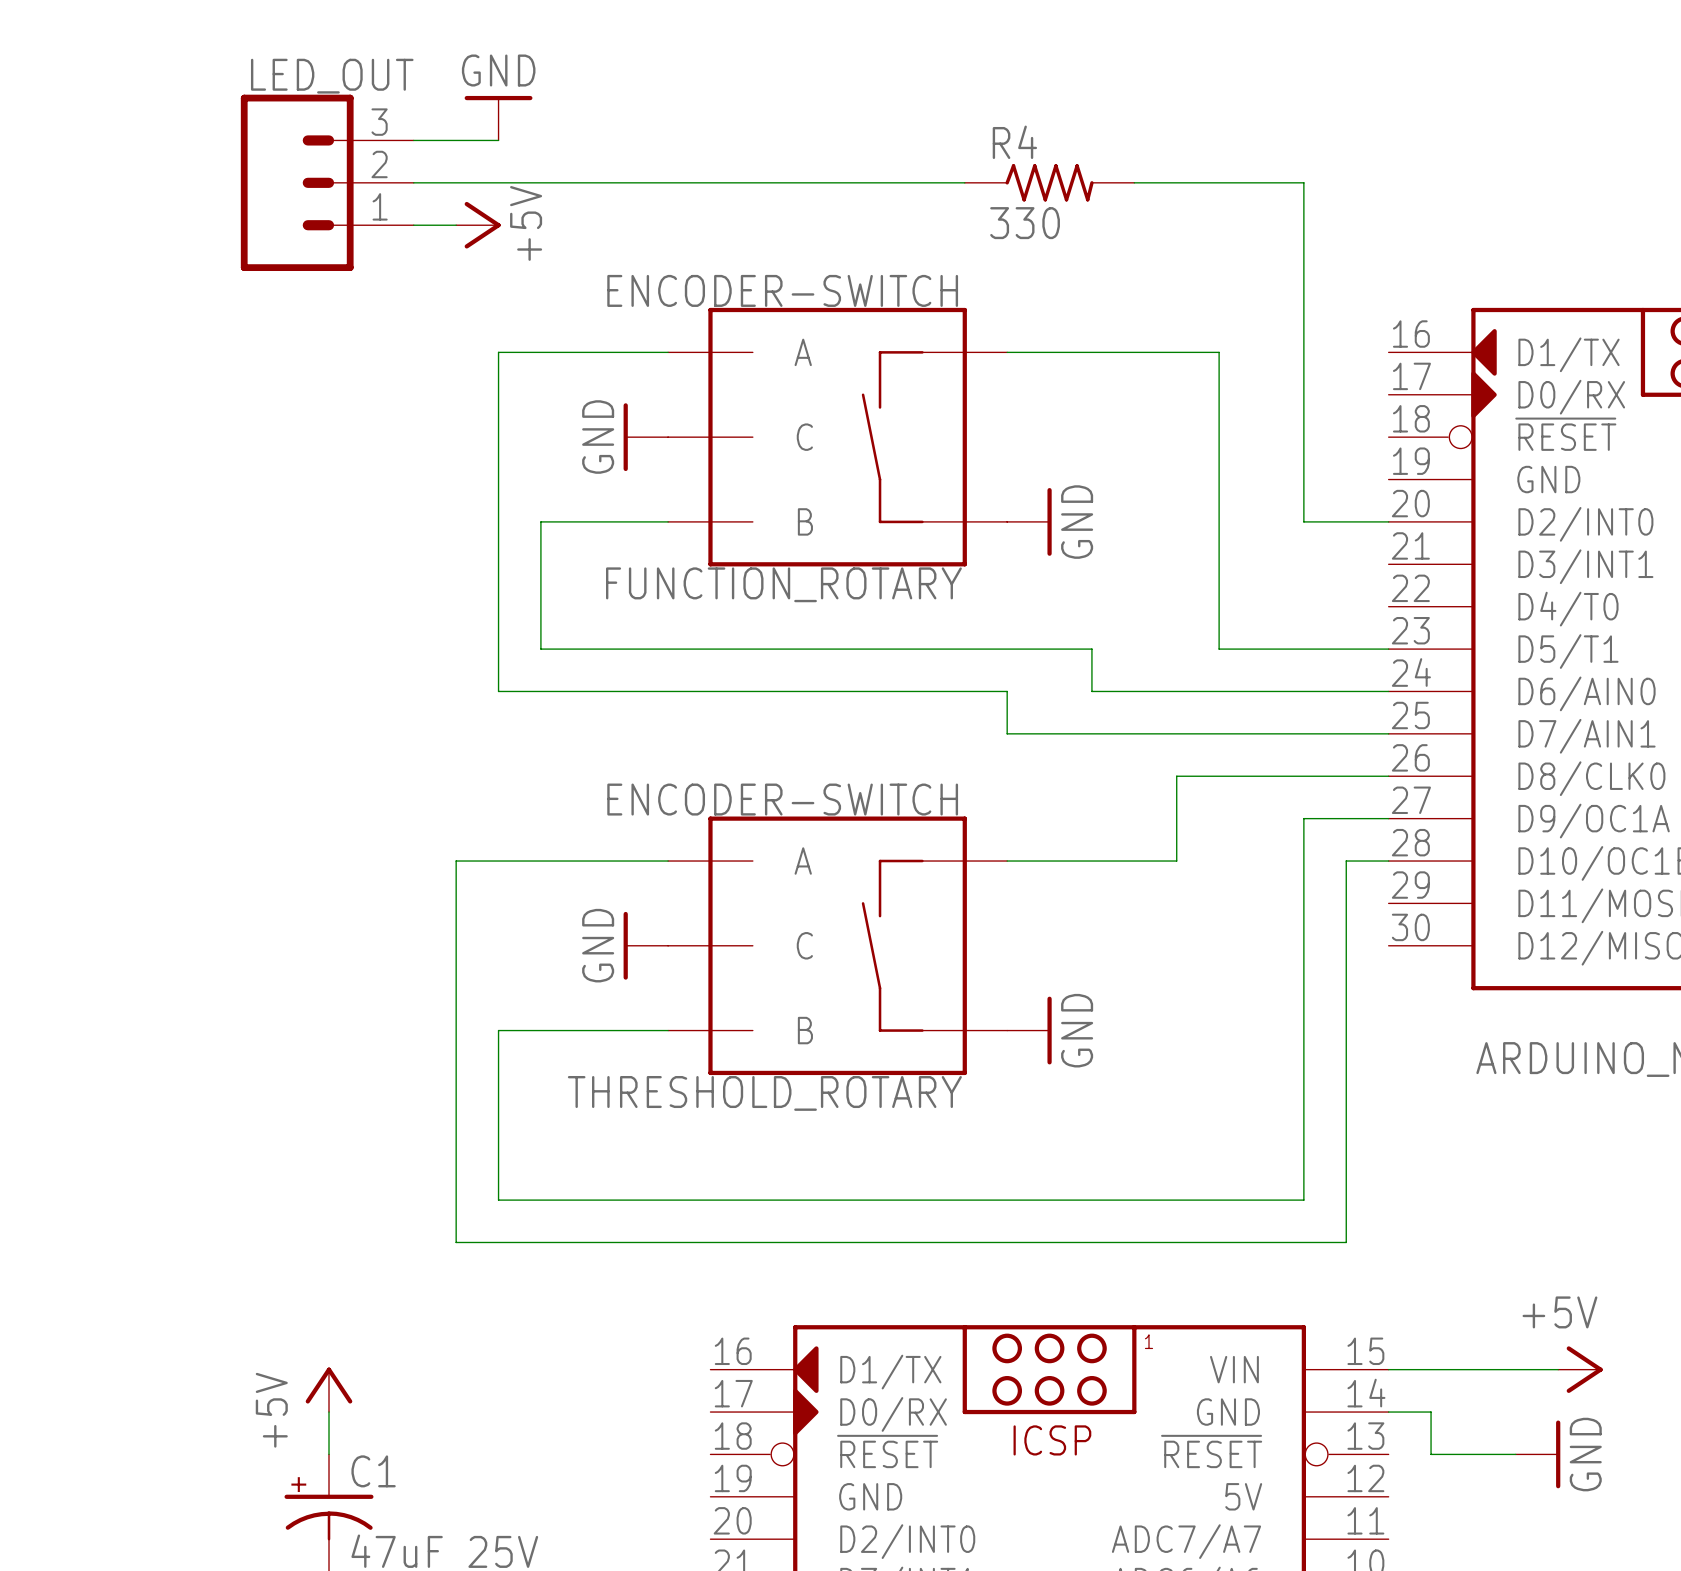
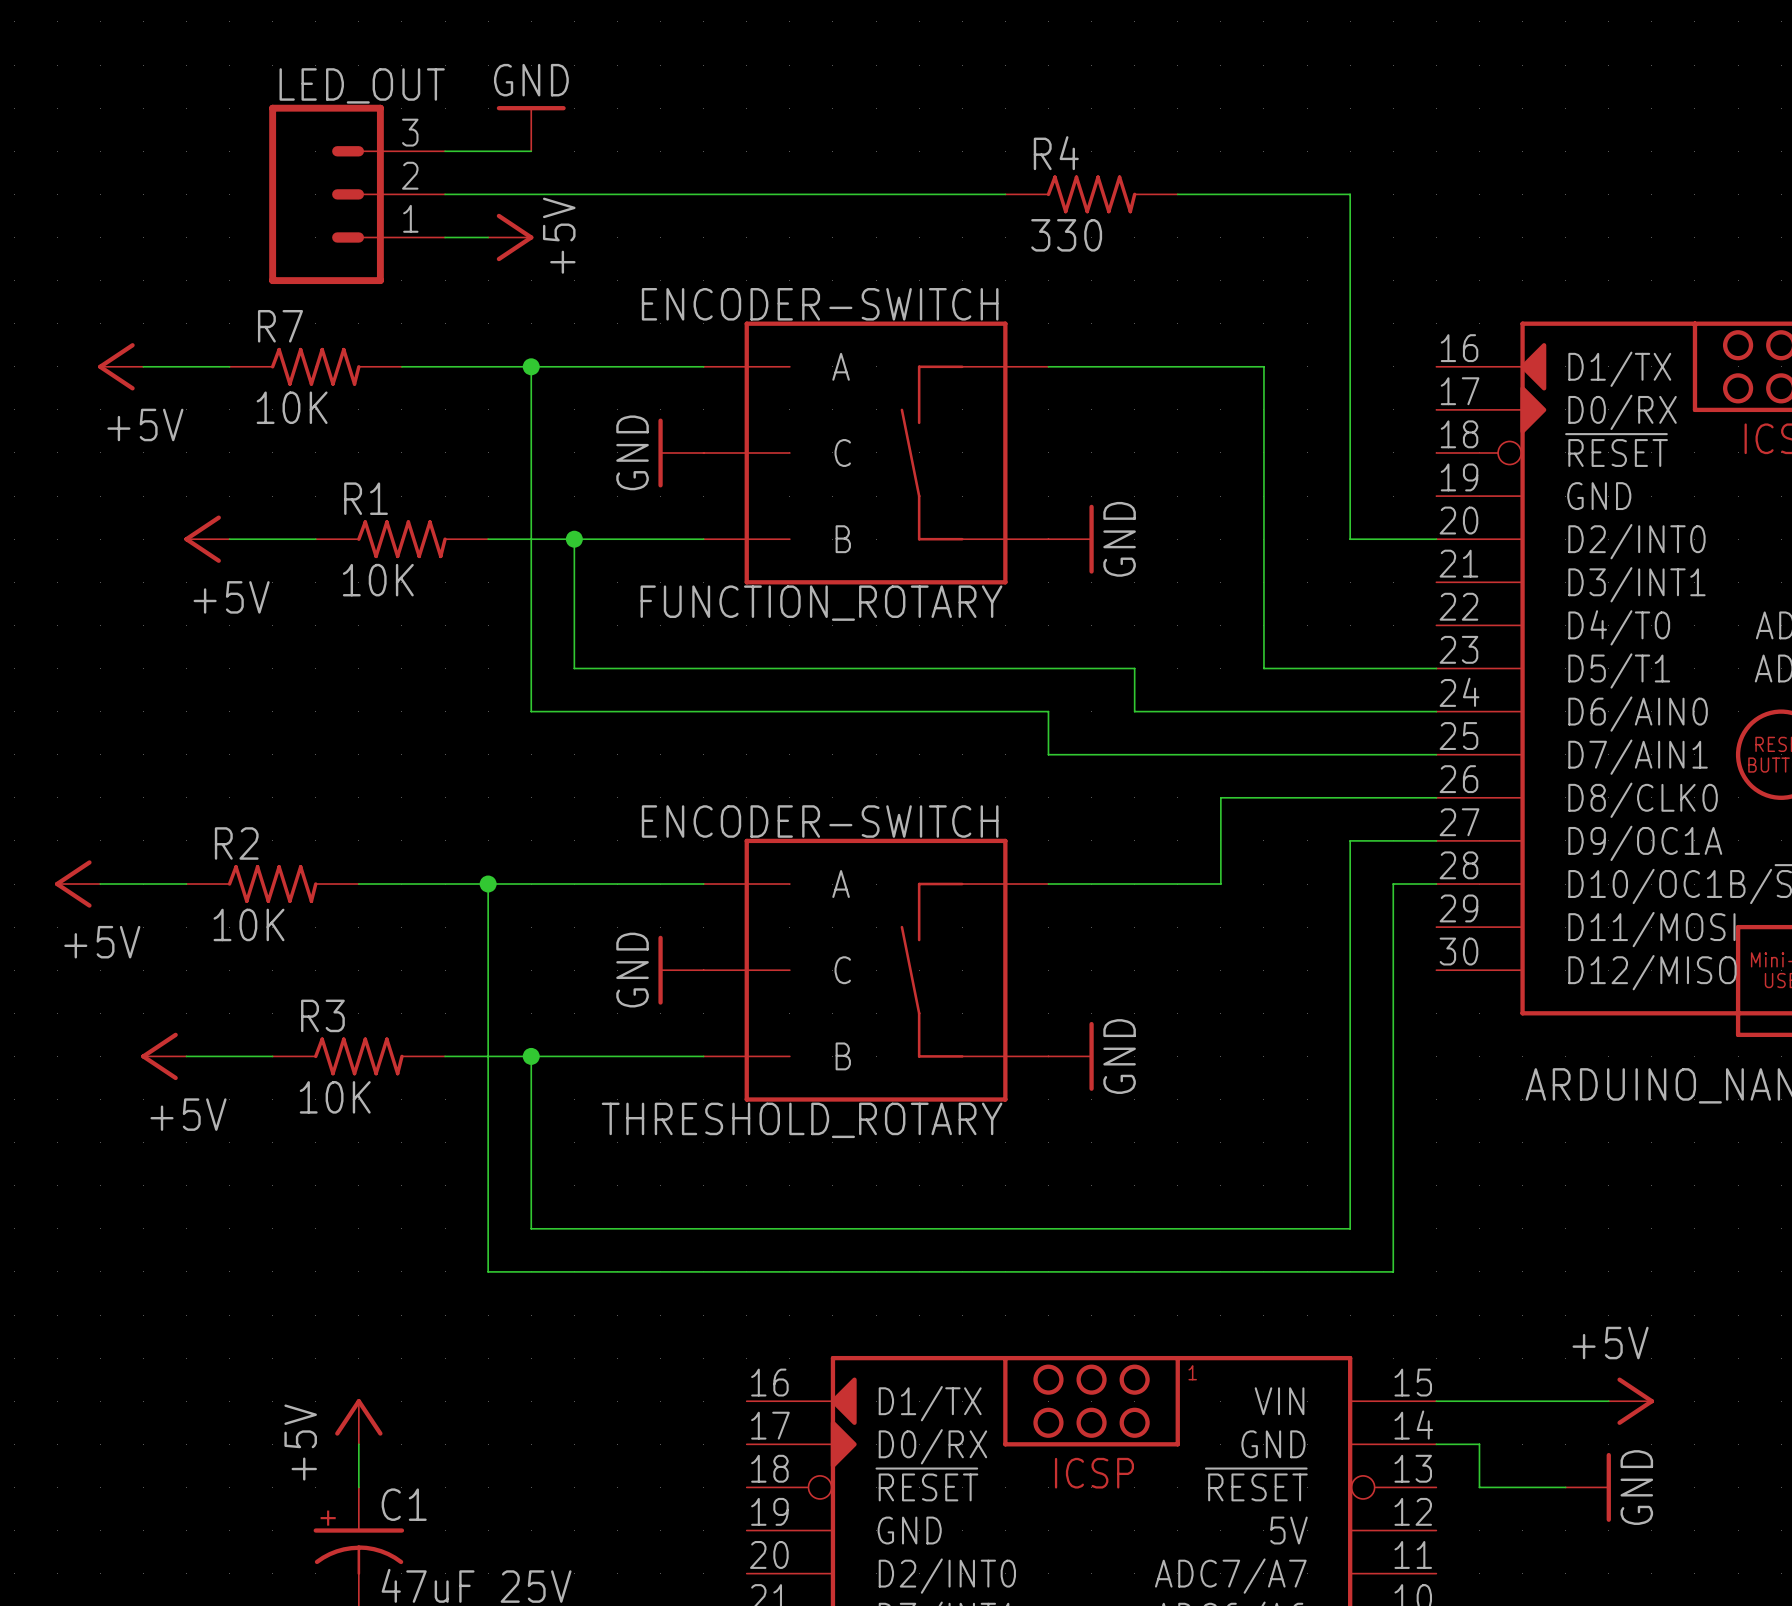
power symbol: none -> +5V (120, 366)
wire: none -> (143, 366) (229, 366)
R7: none -> 10K (315, 366)
wire: none -> (401, 366) (531, 366)
junction: none -> (531, 366)
power symbol: none -> +5V (206, 539)
wire: none -> (229, 539) (315, 539)
R1: none -> 10K (401, 539)
wire: none -> (488, 539) (574, 539)
junction: none -> (574, 539)
power symbol: none -> +5V (77, 884)
wire: none -> (100, 884) (186, 884)
R2: none -> 10K (272, 884)
wire: none -> (358, 884) (488, 884)
junction: none -> (488, 884)
power symbol: none -> +5V (163, 1056)
wire: none -> (186, 1056) (272, 1056)
R3: none -> 10K (358, 1056)
wire: none -> (445, 1056) (531, 1056)
junction: none -> (531, 1056)

